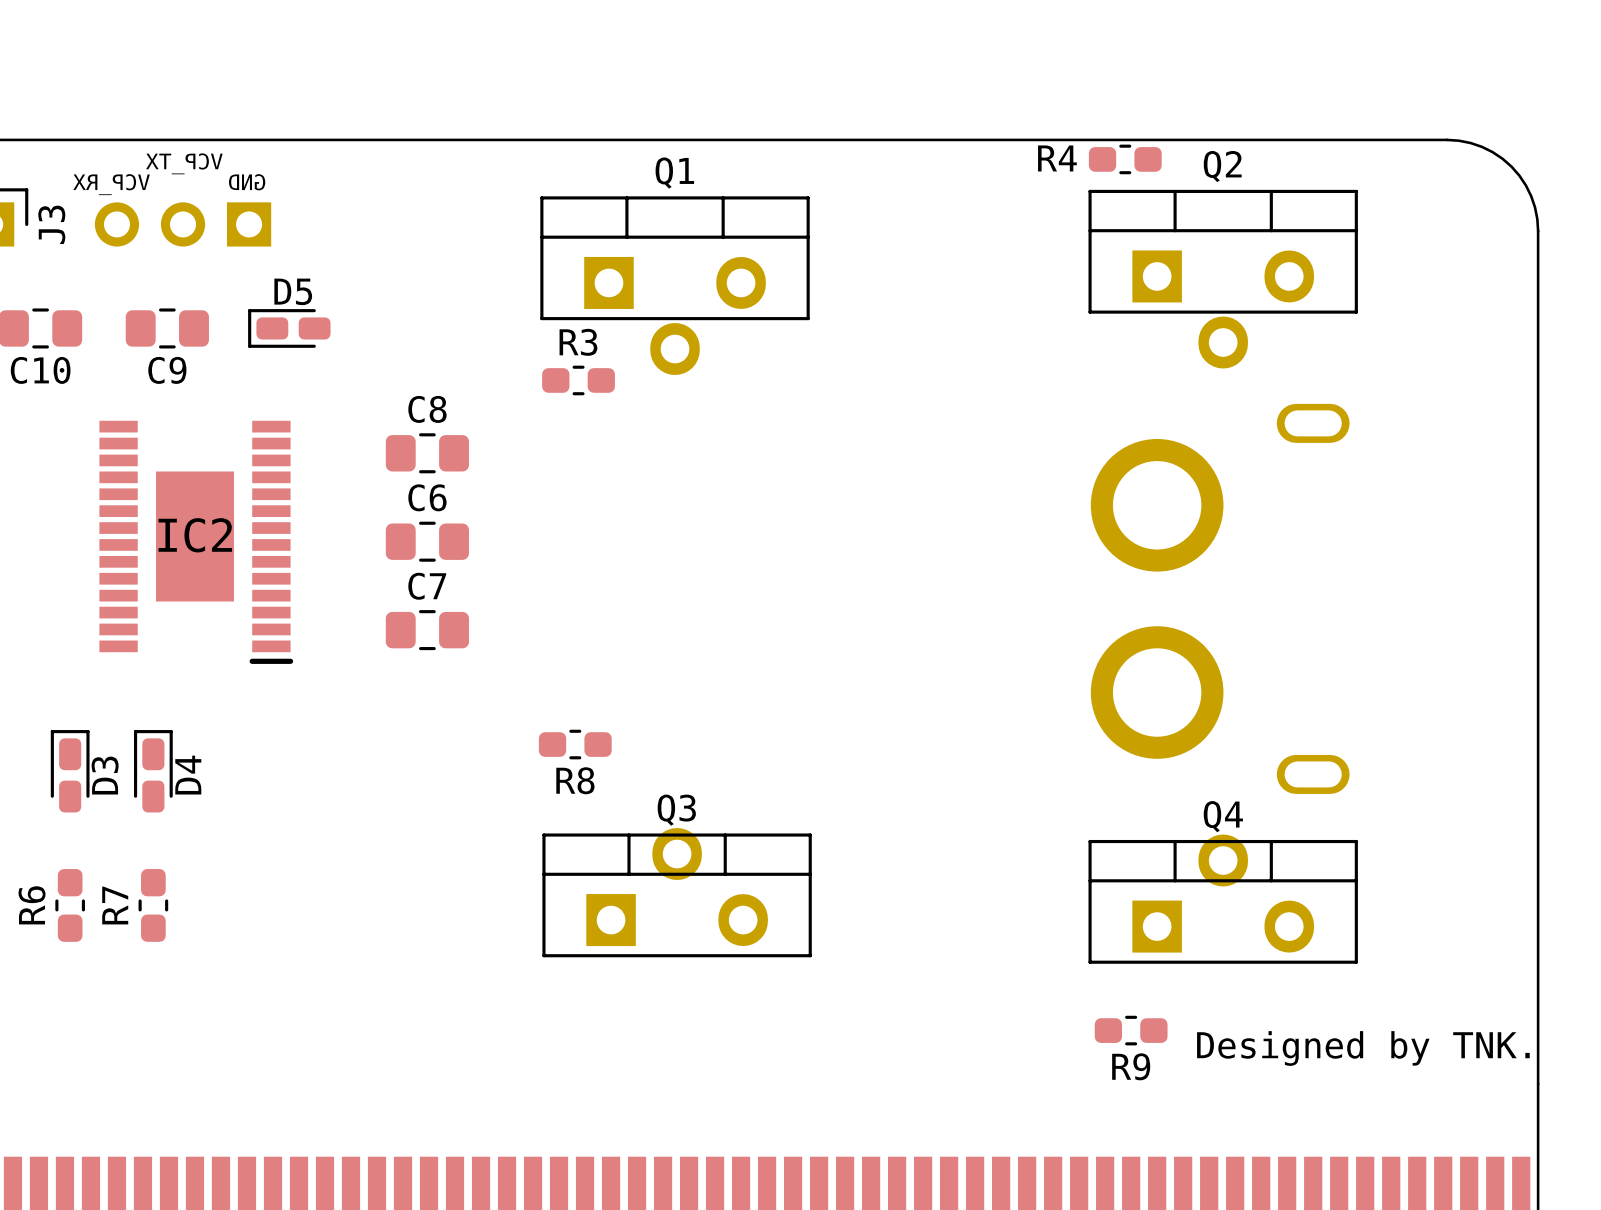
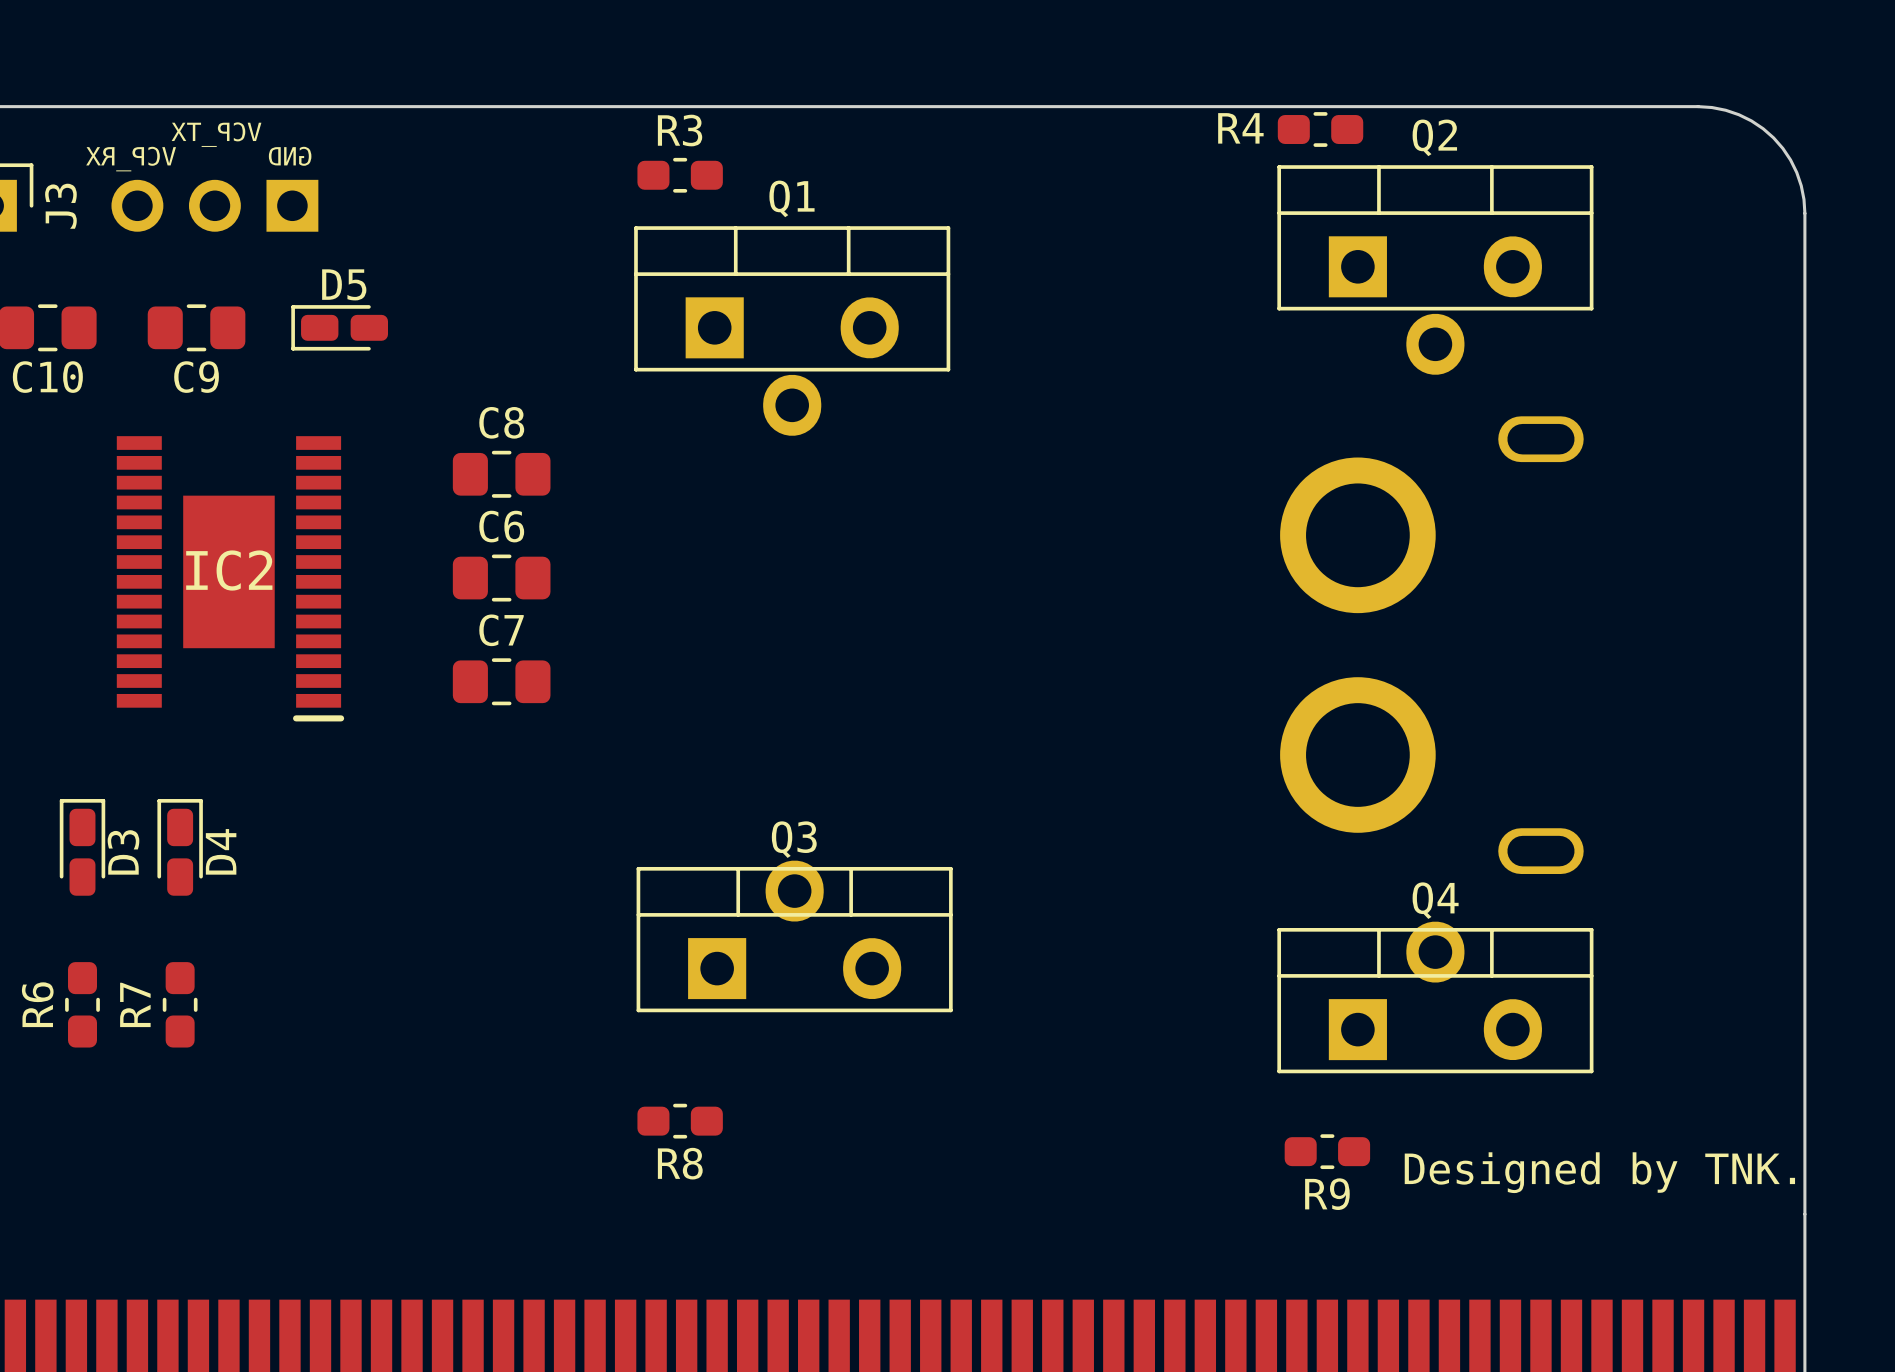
Q1 position: (675, 285) -> (792, 331)
R3 position: (578, 380) -> (680, 175)
R8 position: (575, 744) -> (680, 1121)
Q3 position: (677, 892) -> (794, 936)

